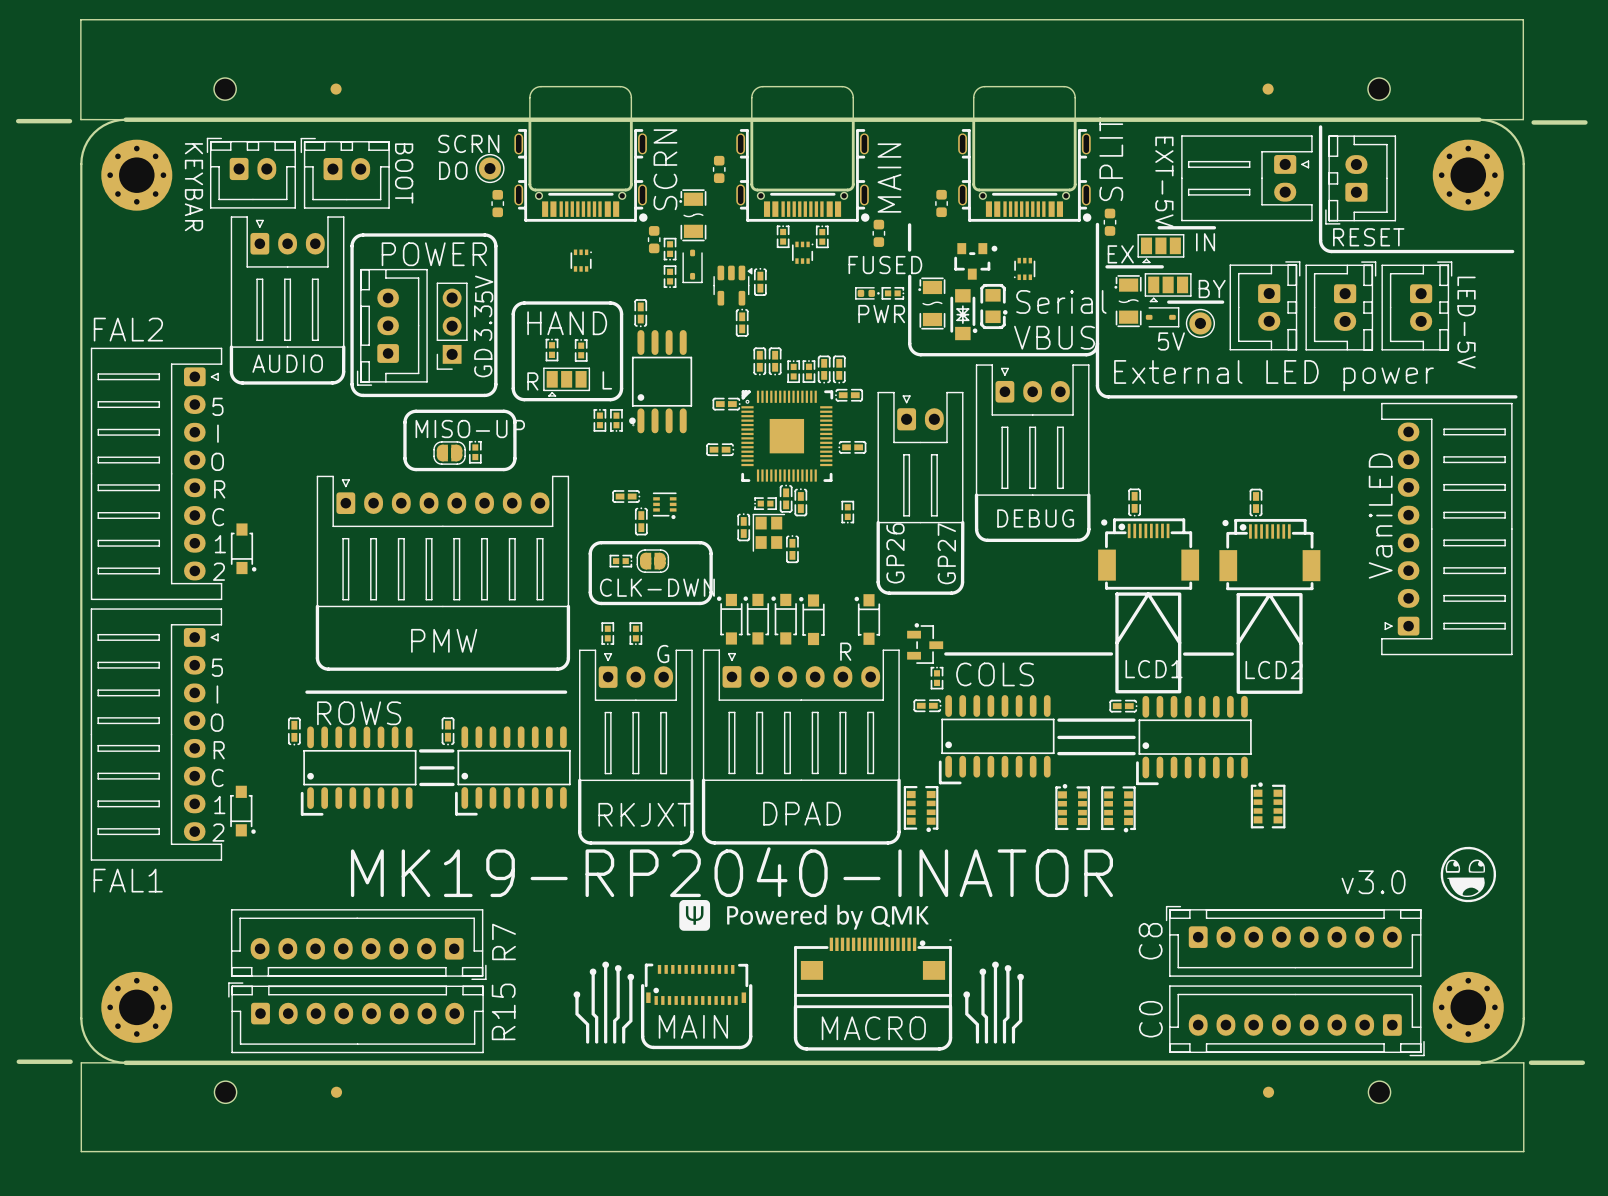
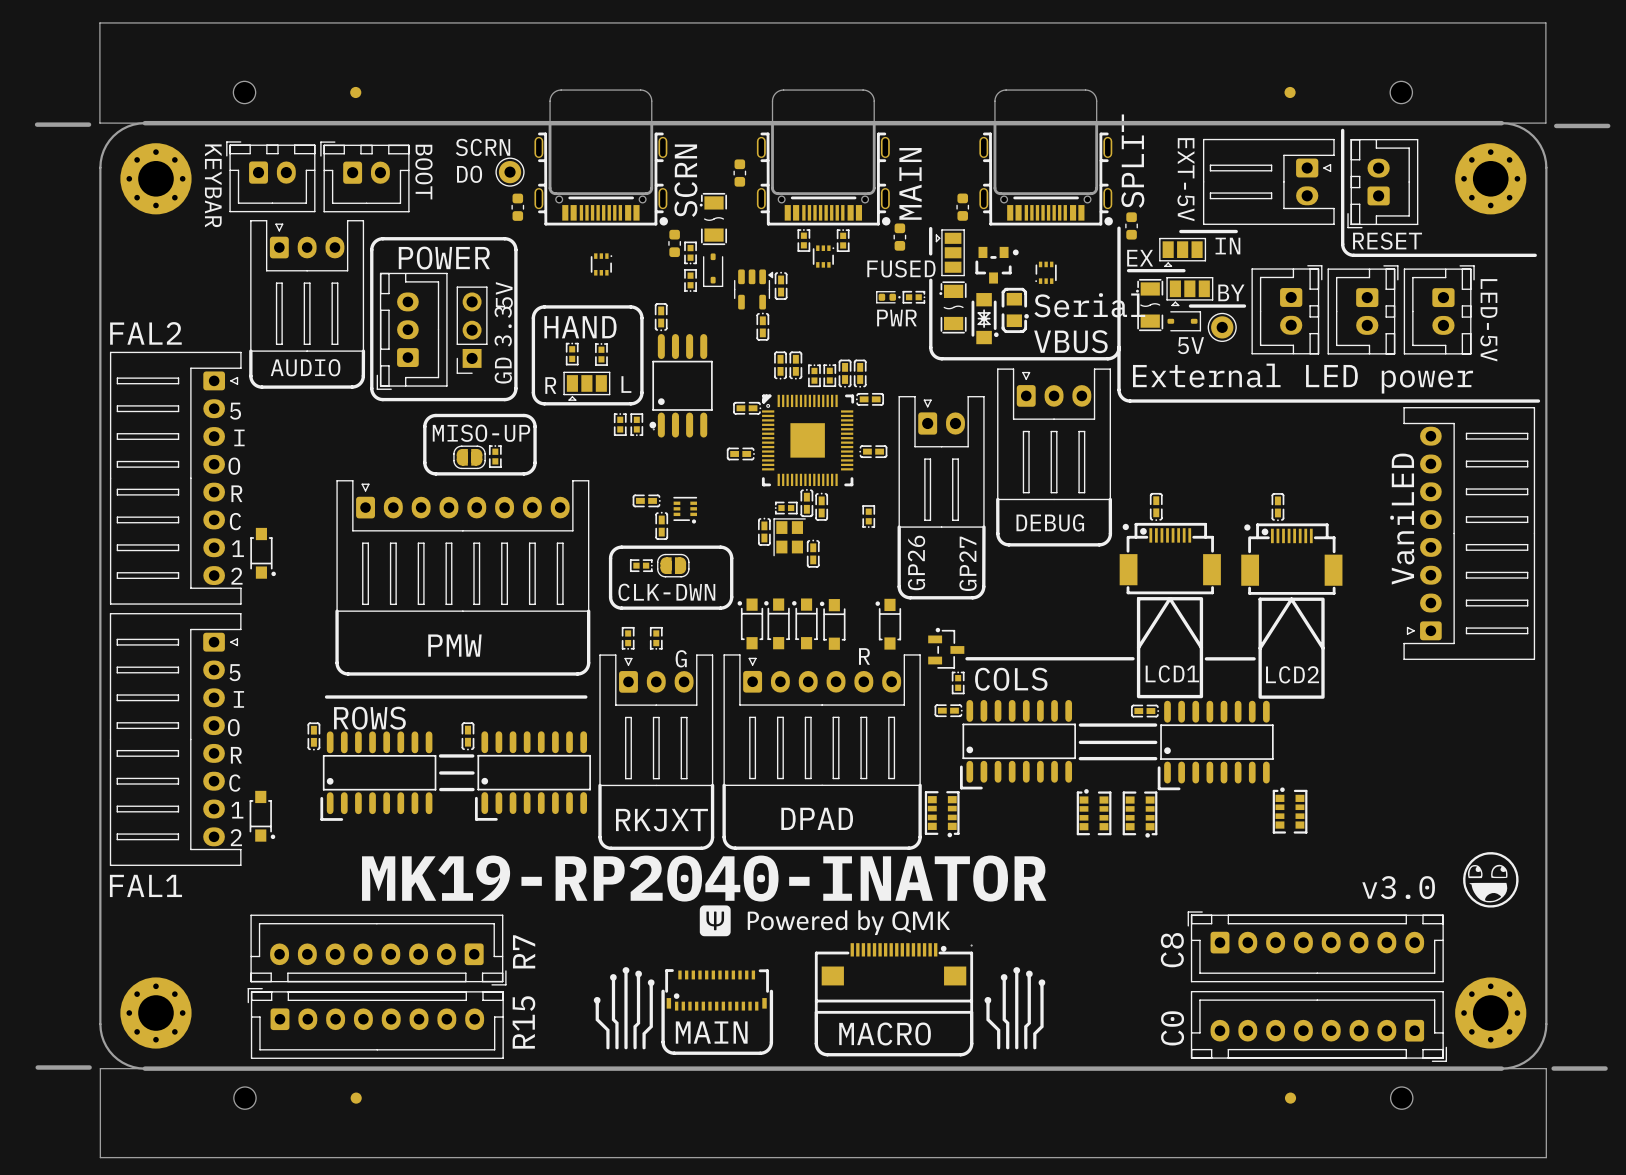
part: none -> (950, 252)

